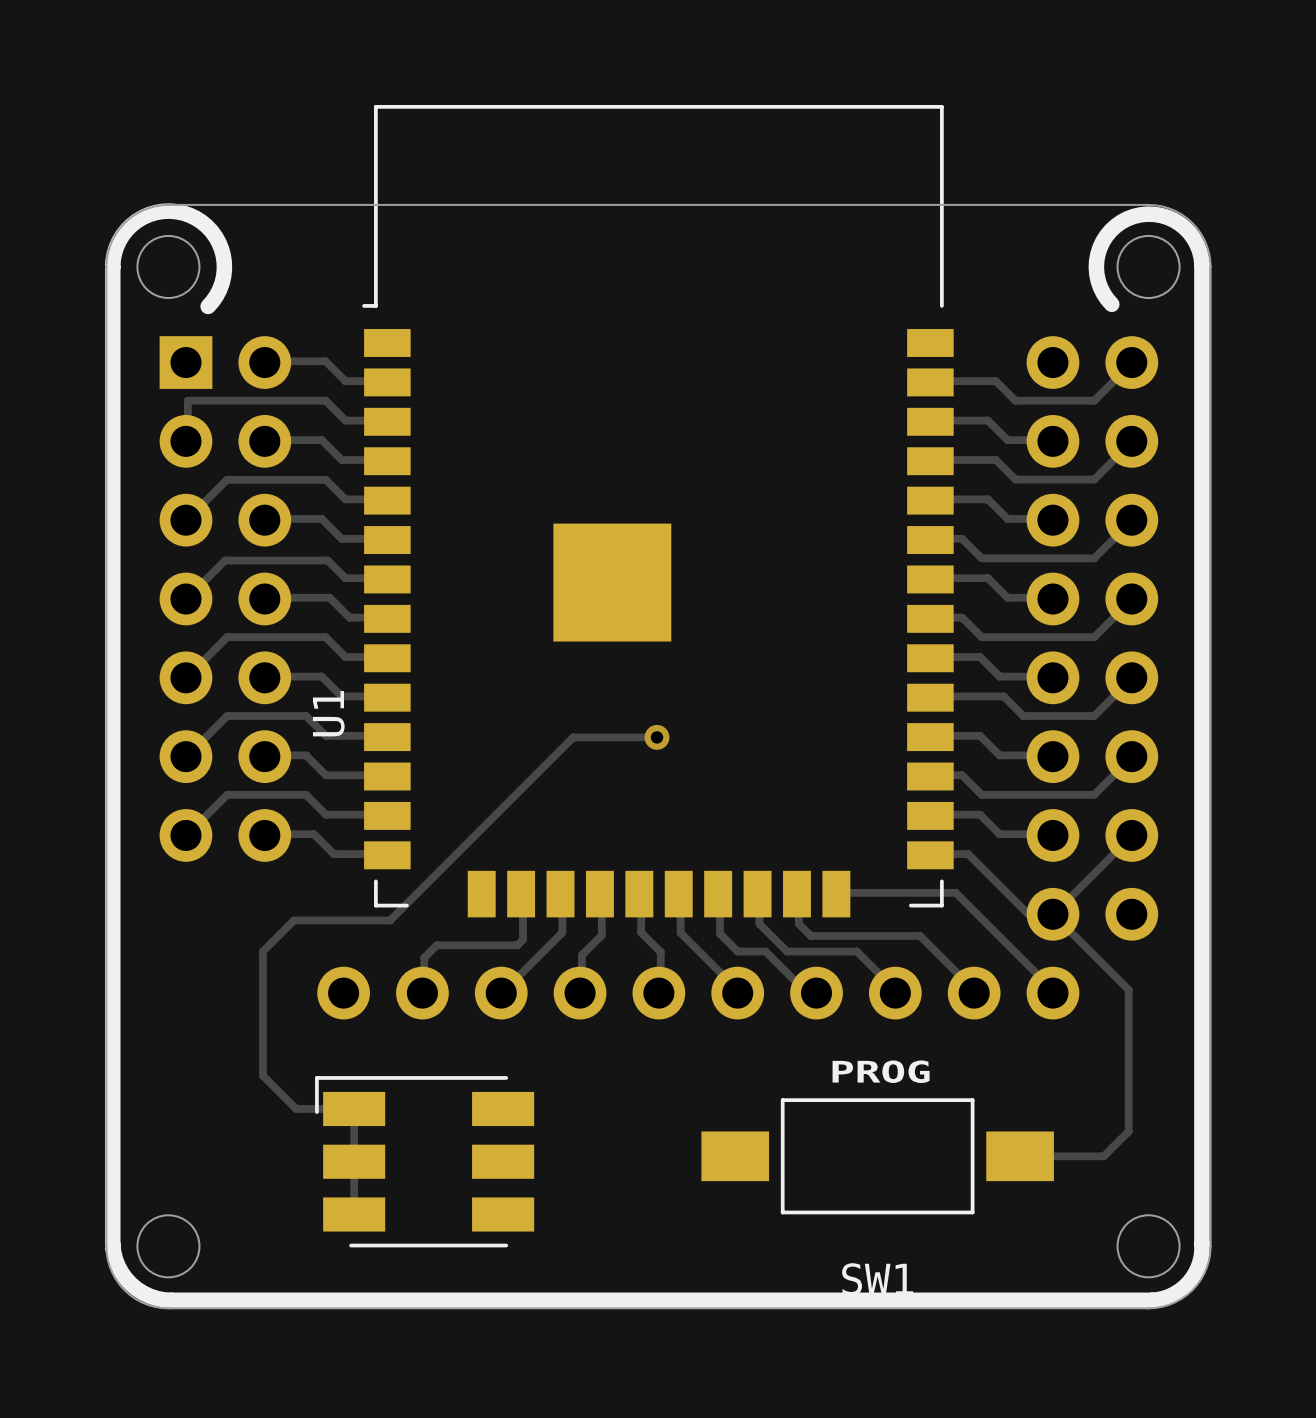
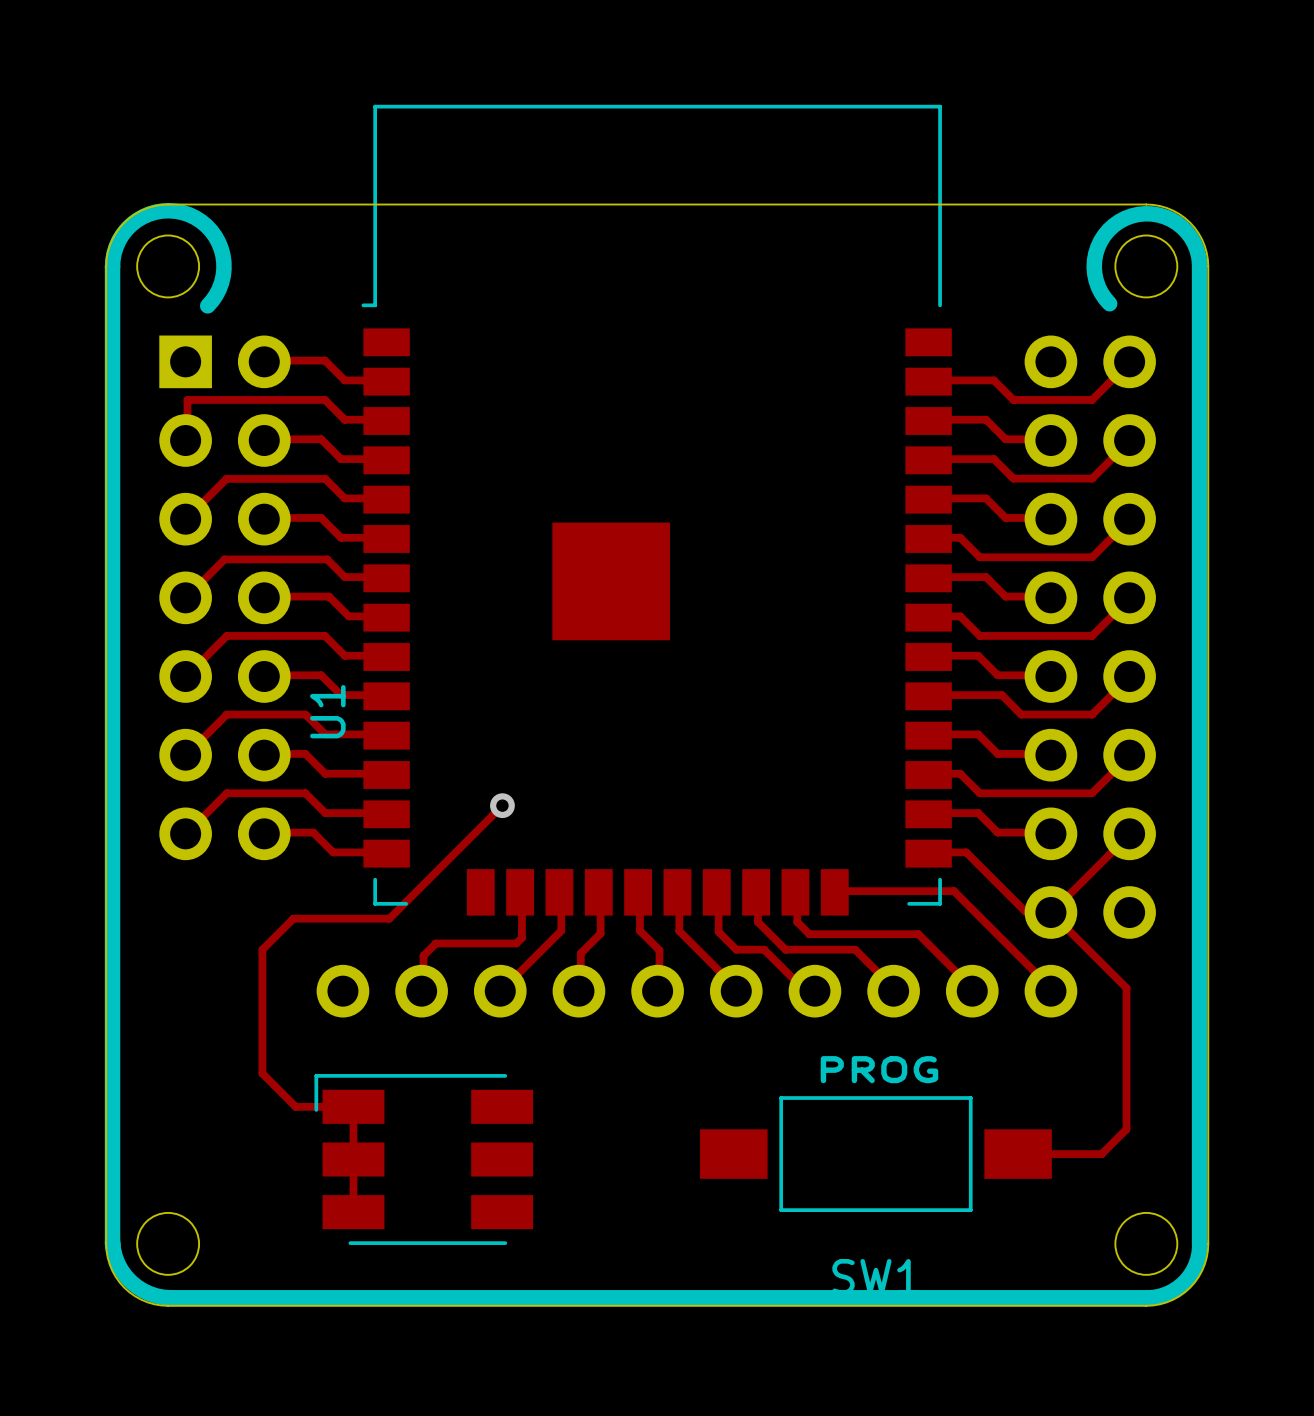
track: (657, 737) (573, 737) (503, 807) -> none
via position: (657, 737) -> (502, 805)

